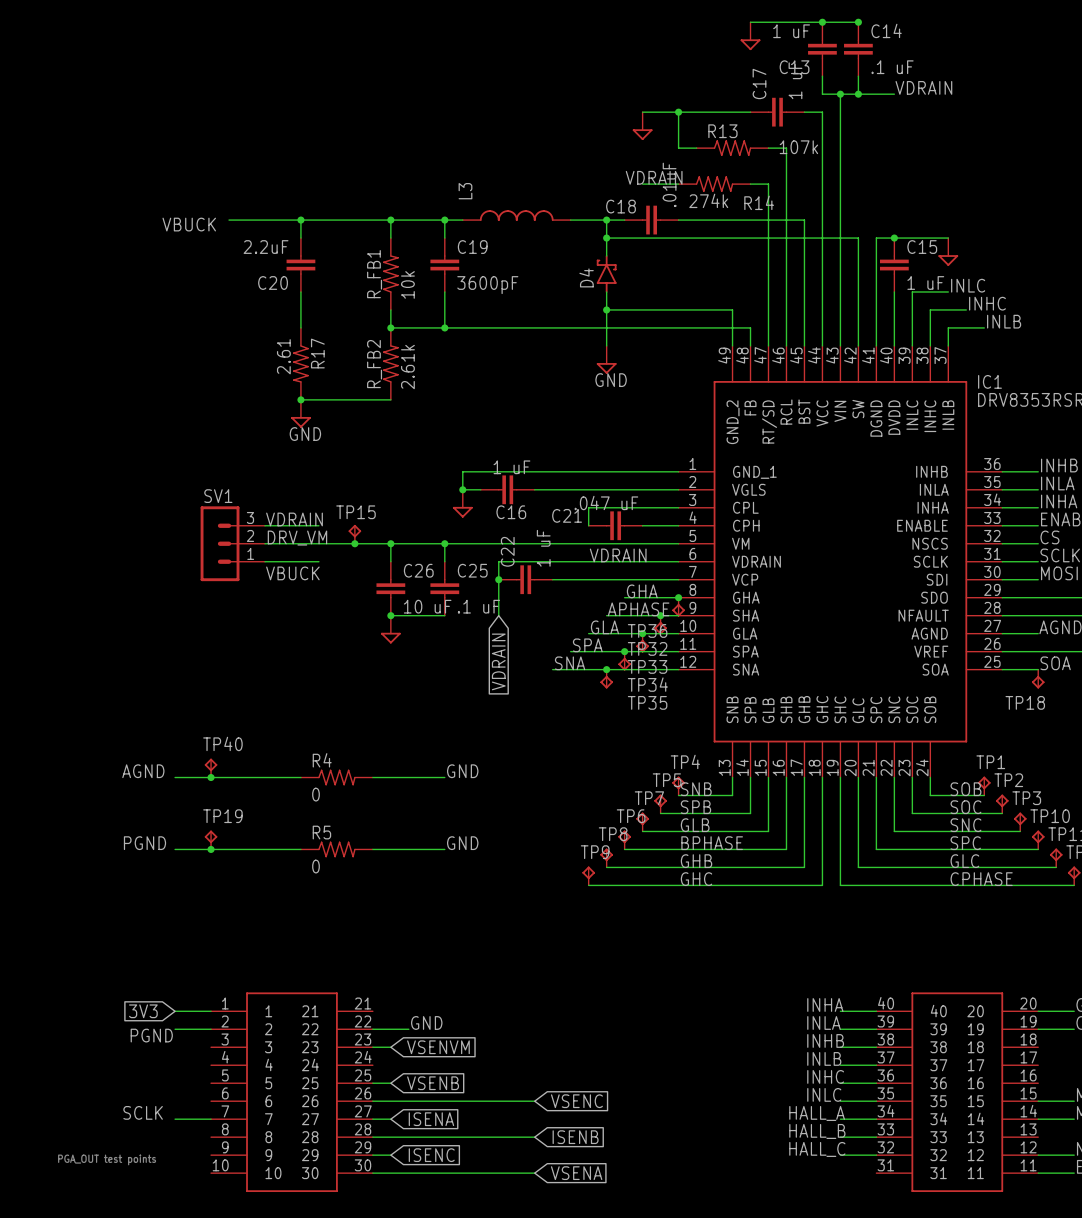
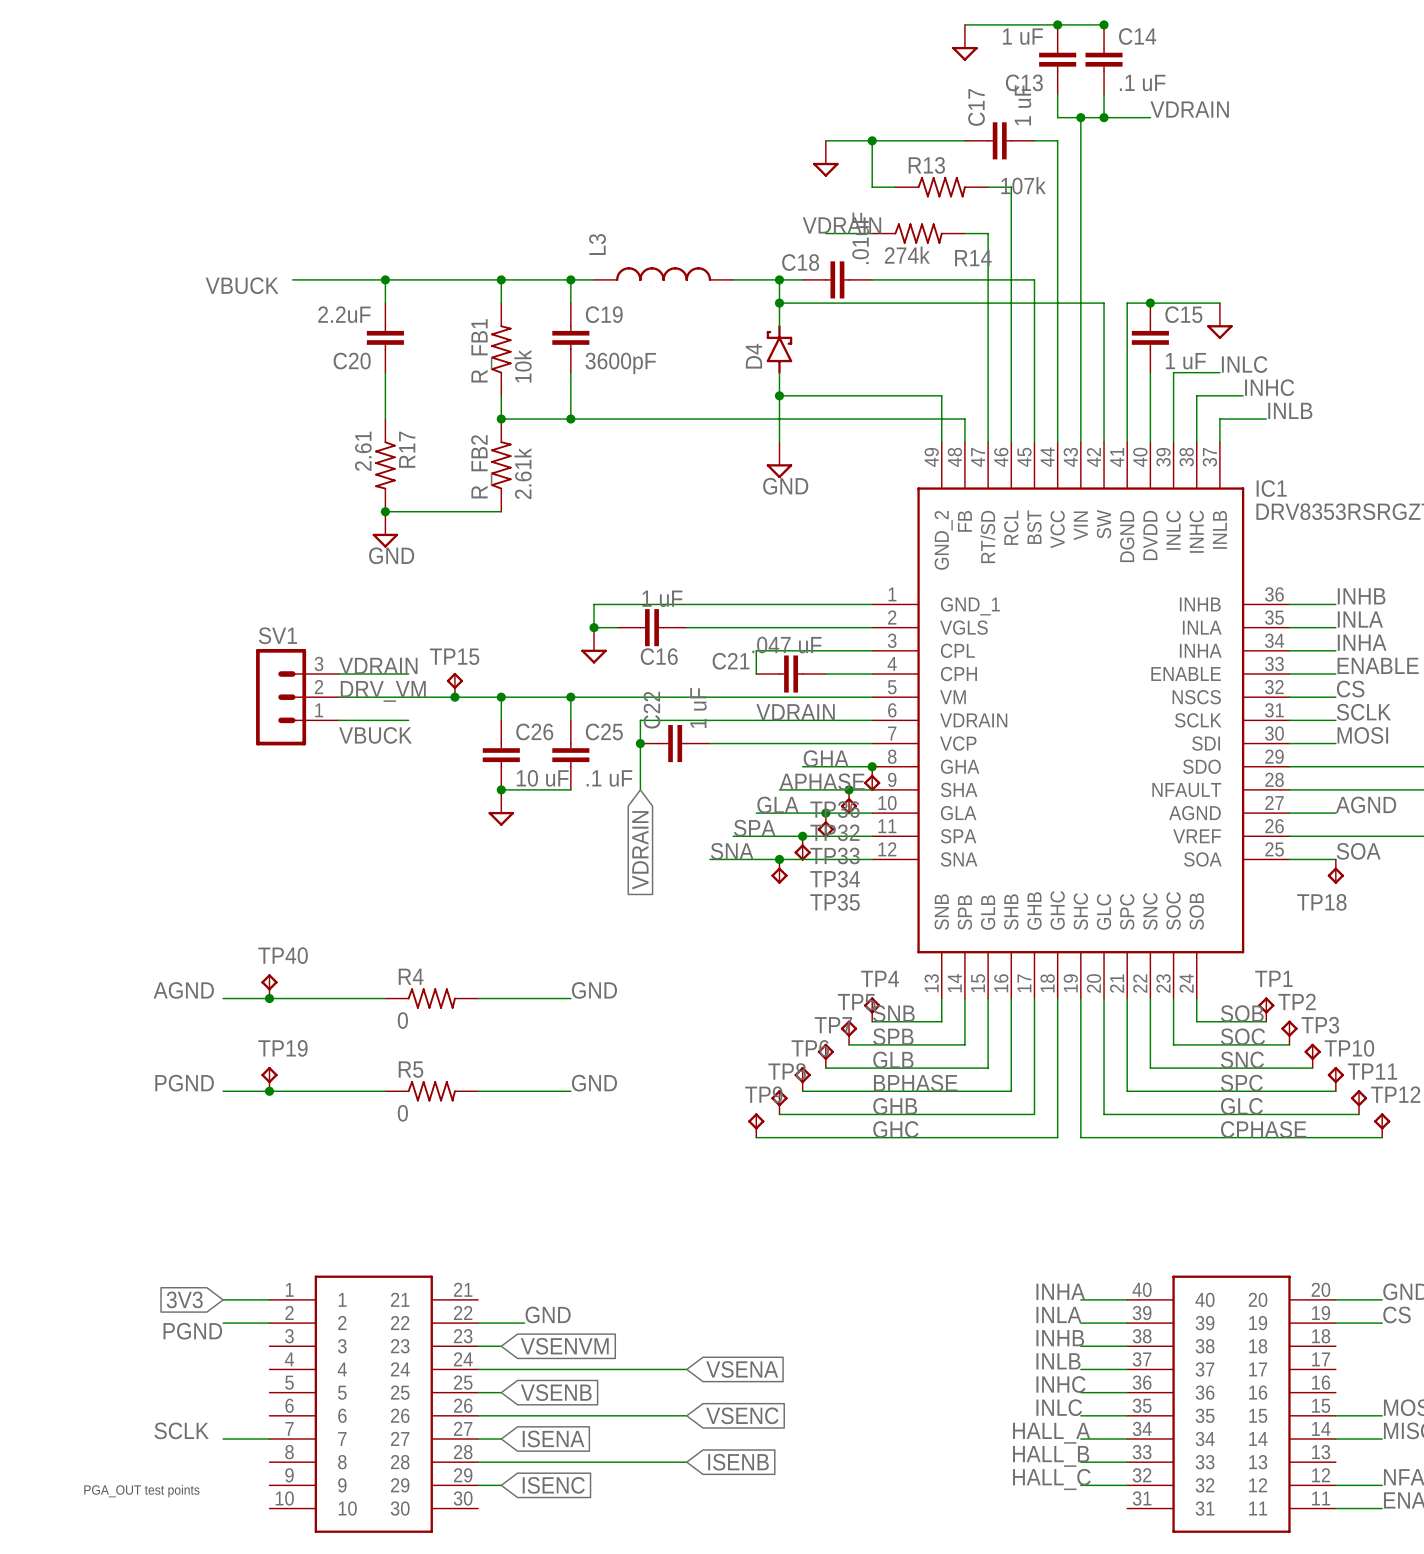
wire: (372, 1173) (534, 1173) -> (478, 1369) (686, 1369)
global label position: VSENA (576, 1173) -> VSENA (742, 1369)

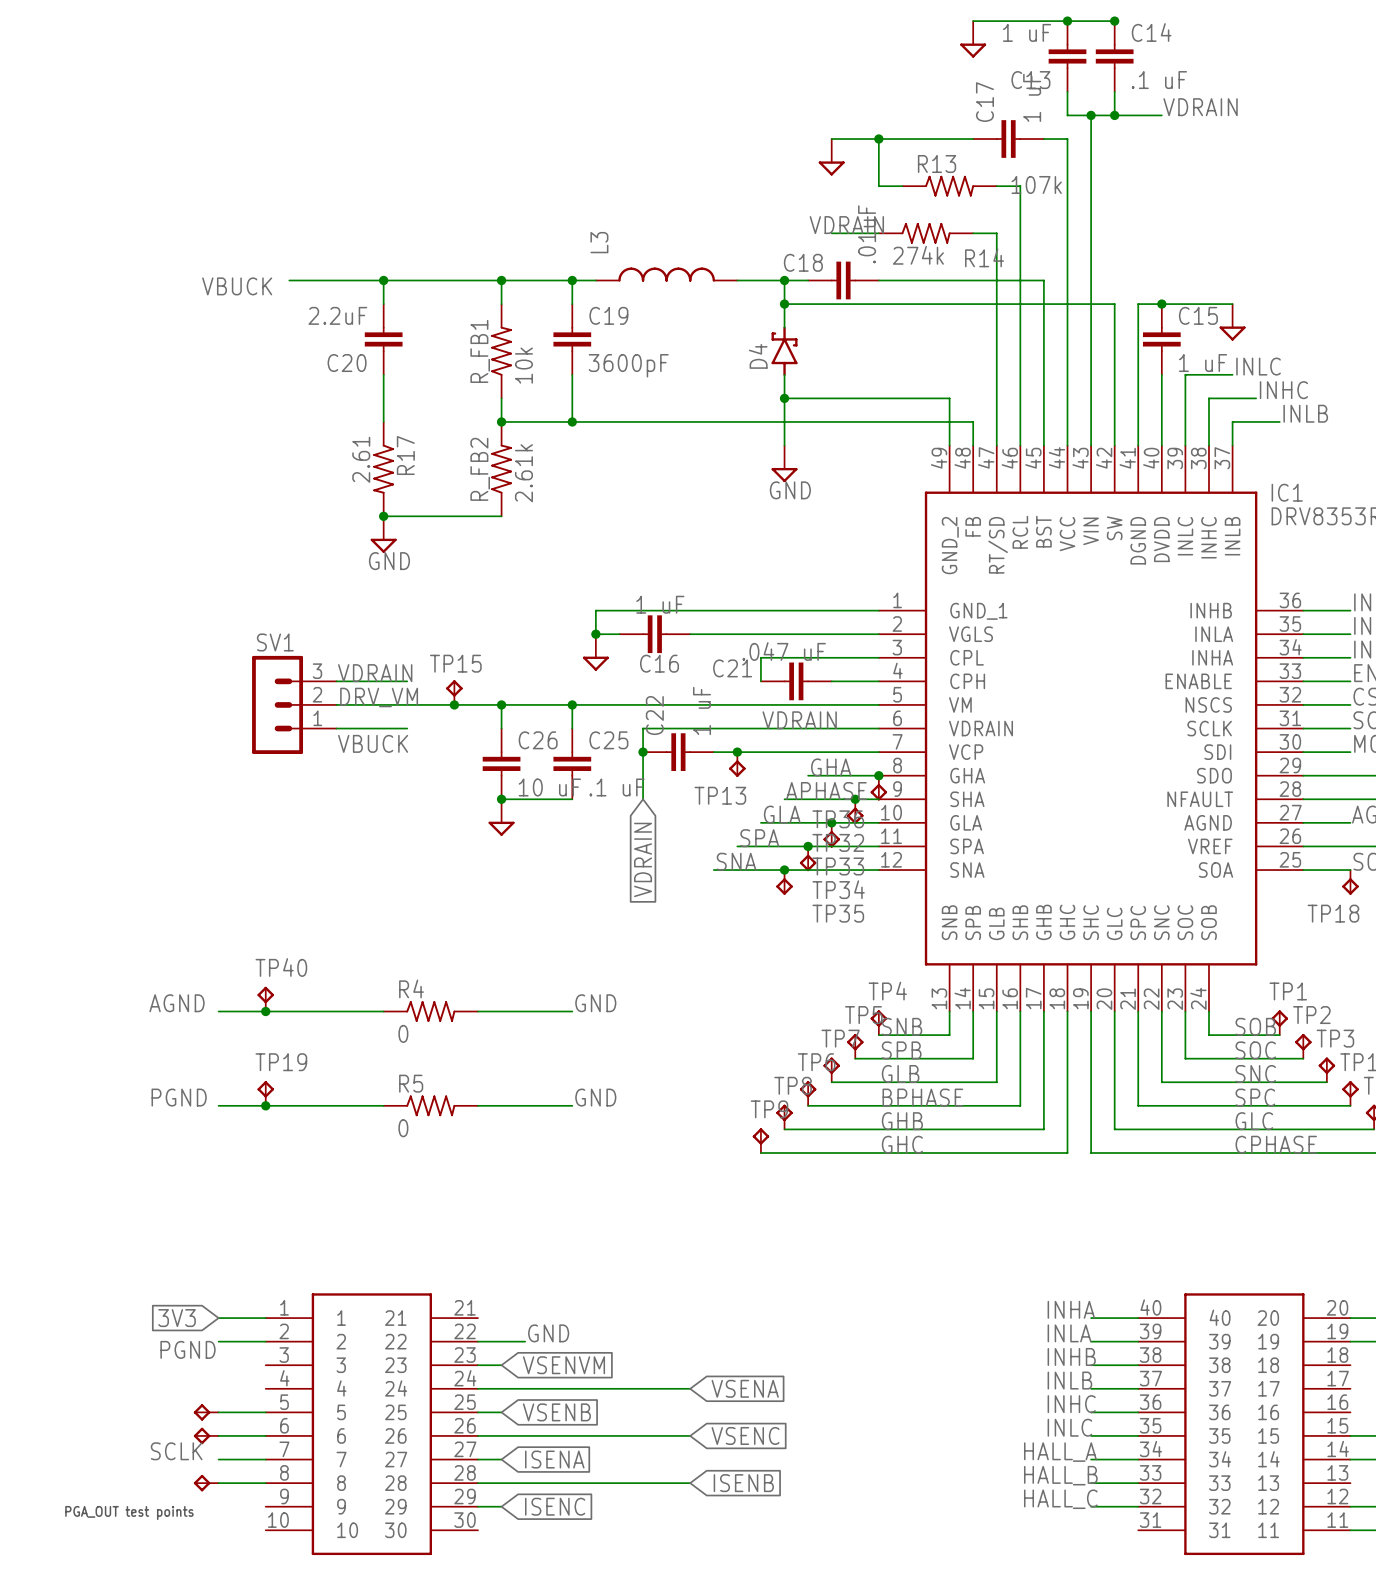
junction: none -> (737, 752)
TP13: none -> (737, 764)
part: none -> (206, 1412)
wire: none -> (218, 1412) (265, 1412)
part: none -> (206, 1435)
wire: none -> (218, 1435) (265, 1435)
part: none -> (206, 1483)
wire: none -> (218, 1483) (265, 1483)

